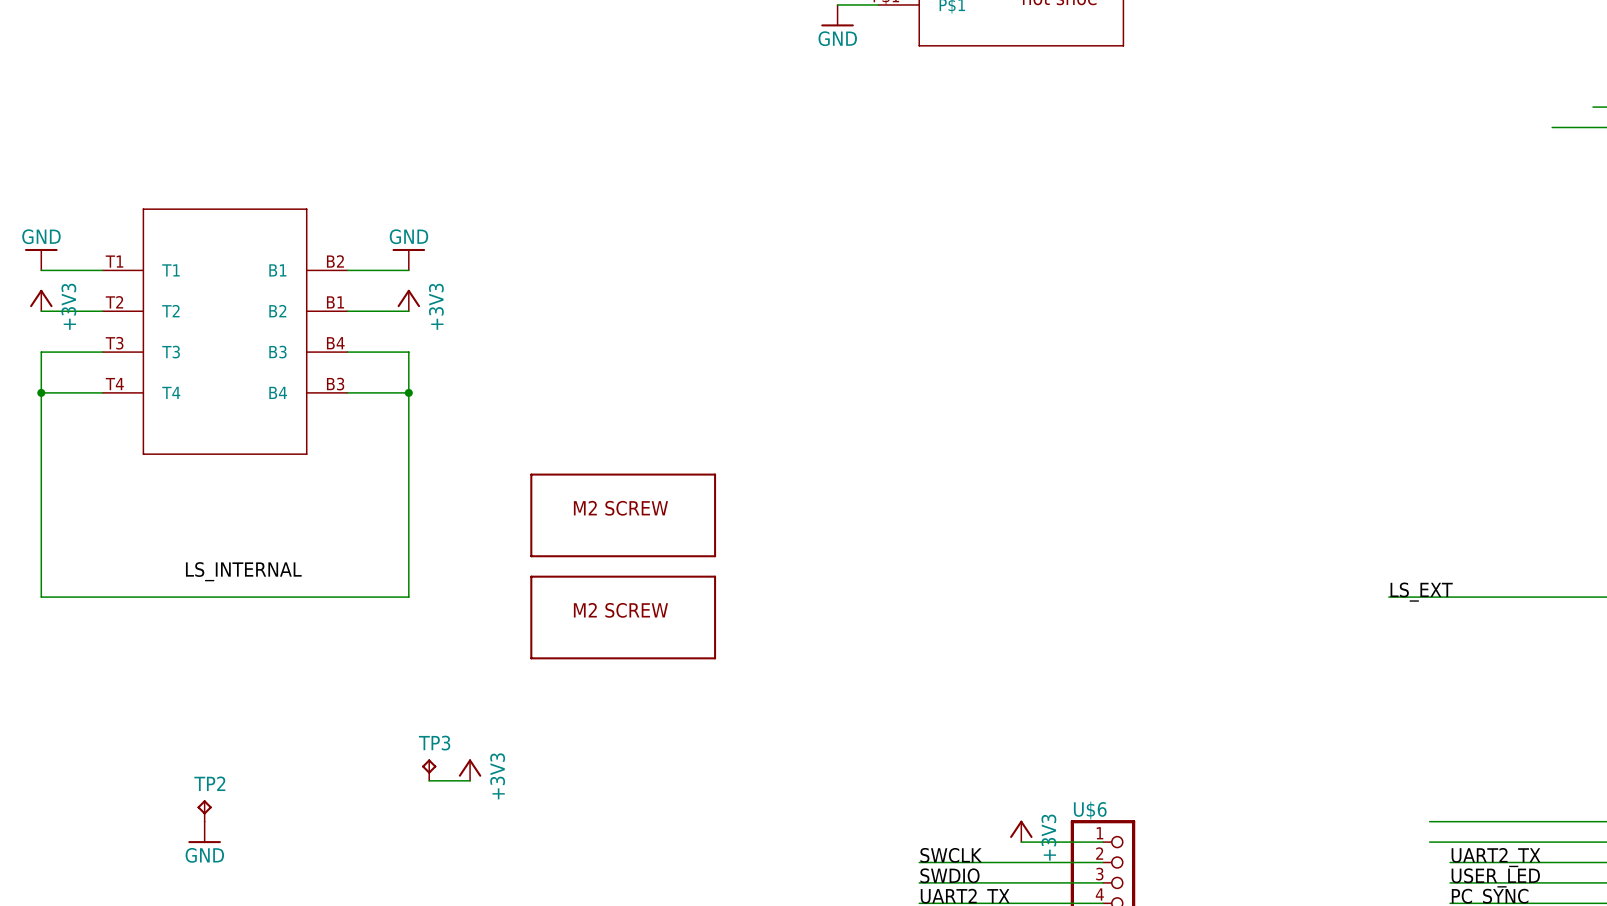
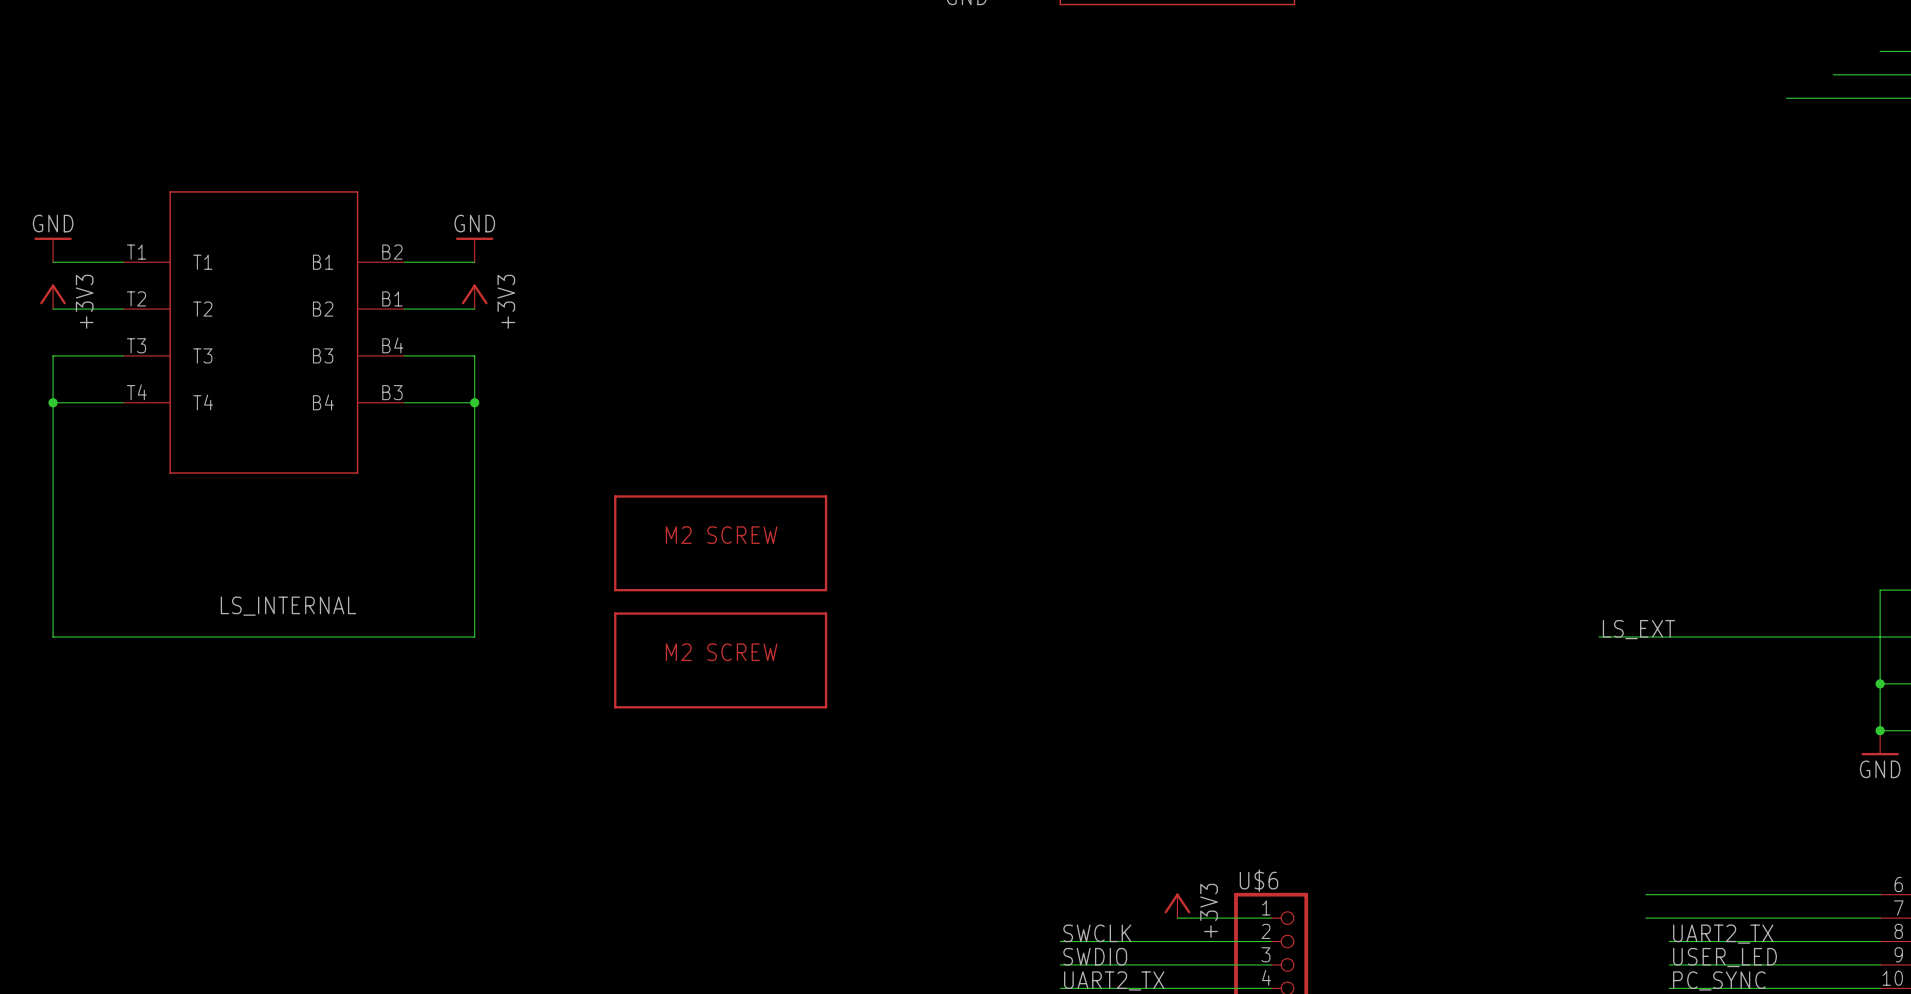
TP3: (429, 770) -> none
power symbol: +3V3 (470, 770) -> none
wire: (429, 780) (470, 780) -> none
TP2: (204, 810) -> none
power symbol: GND (204, 832) -> none

